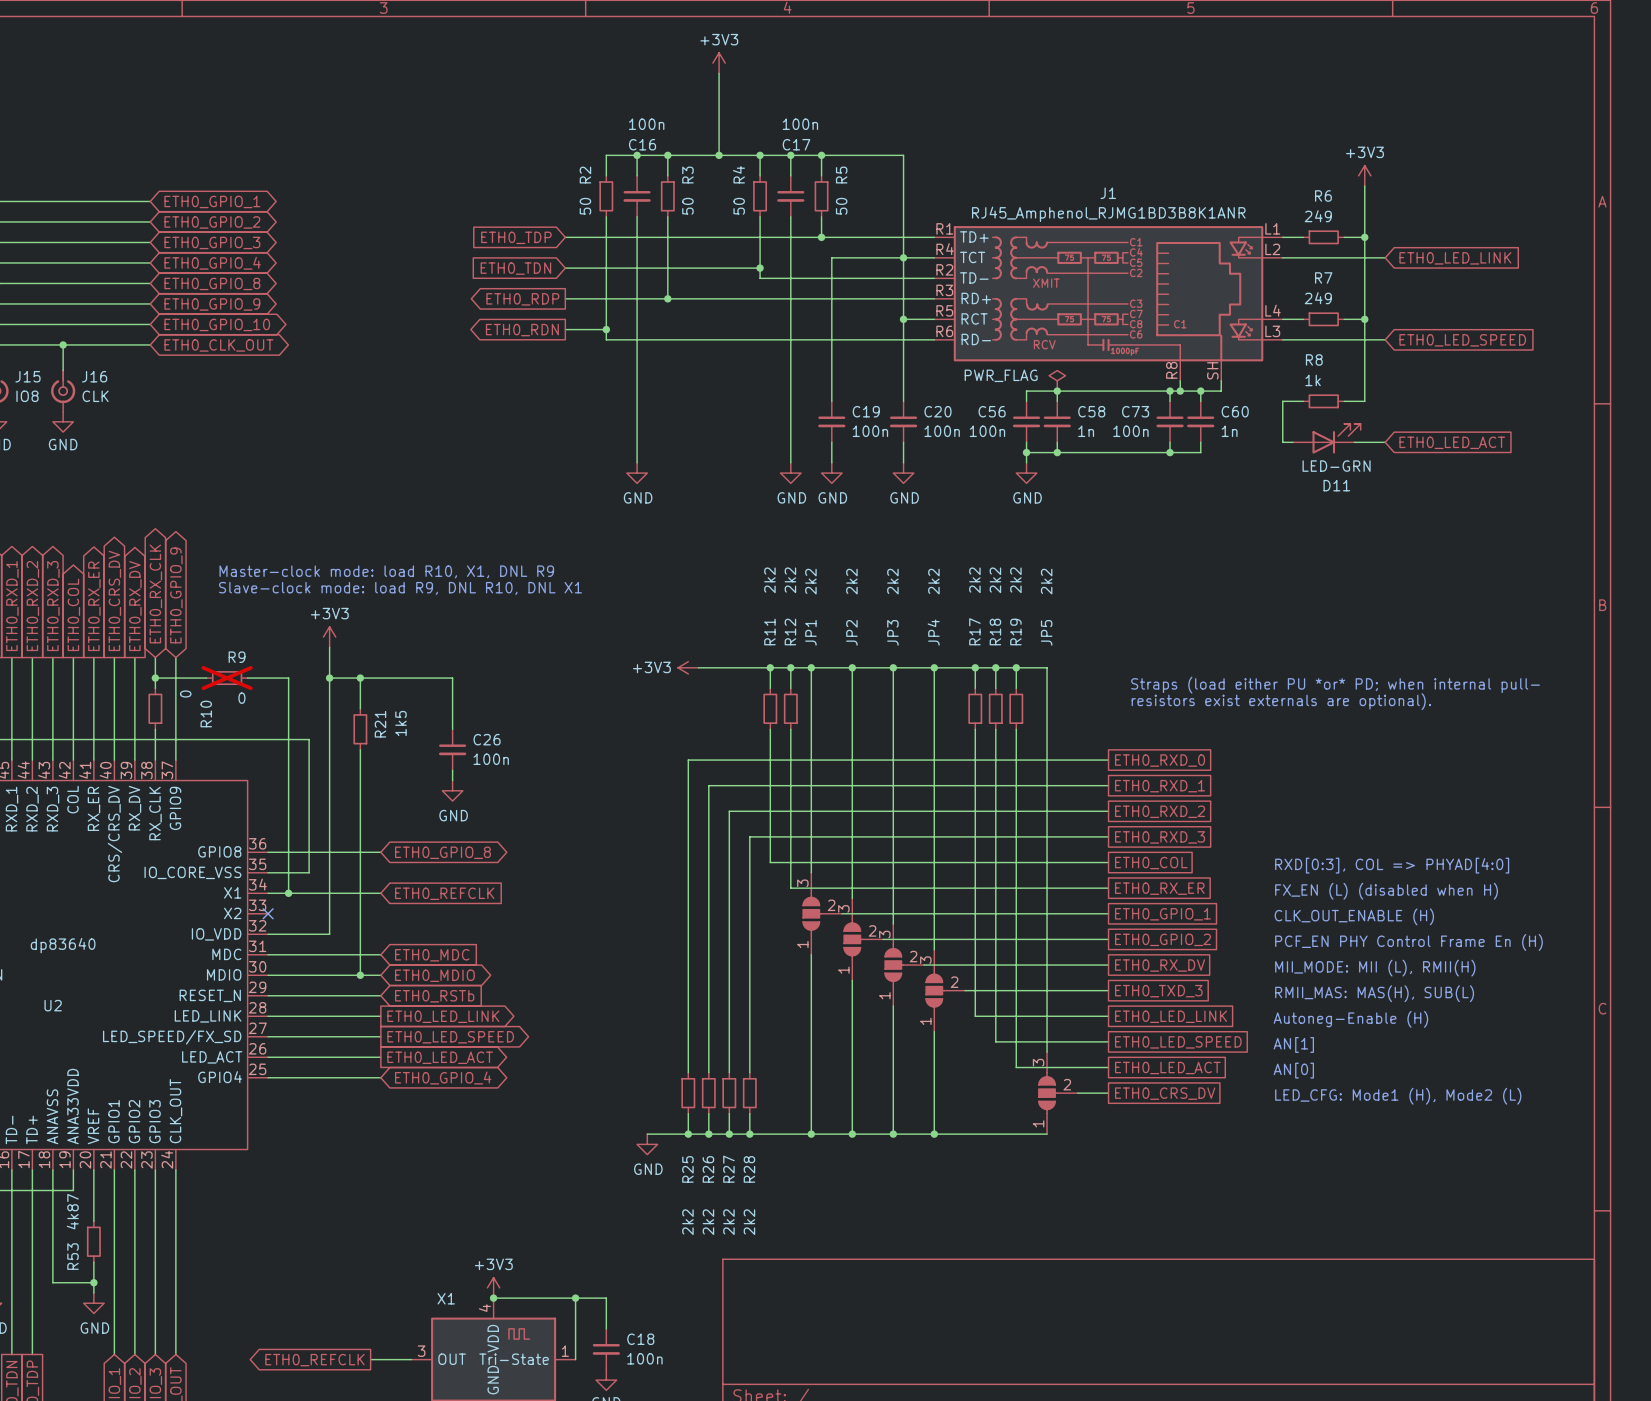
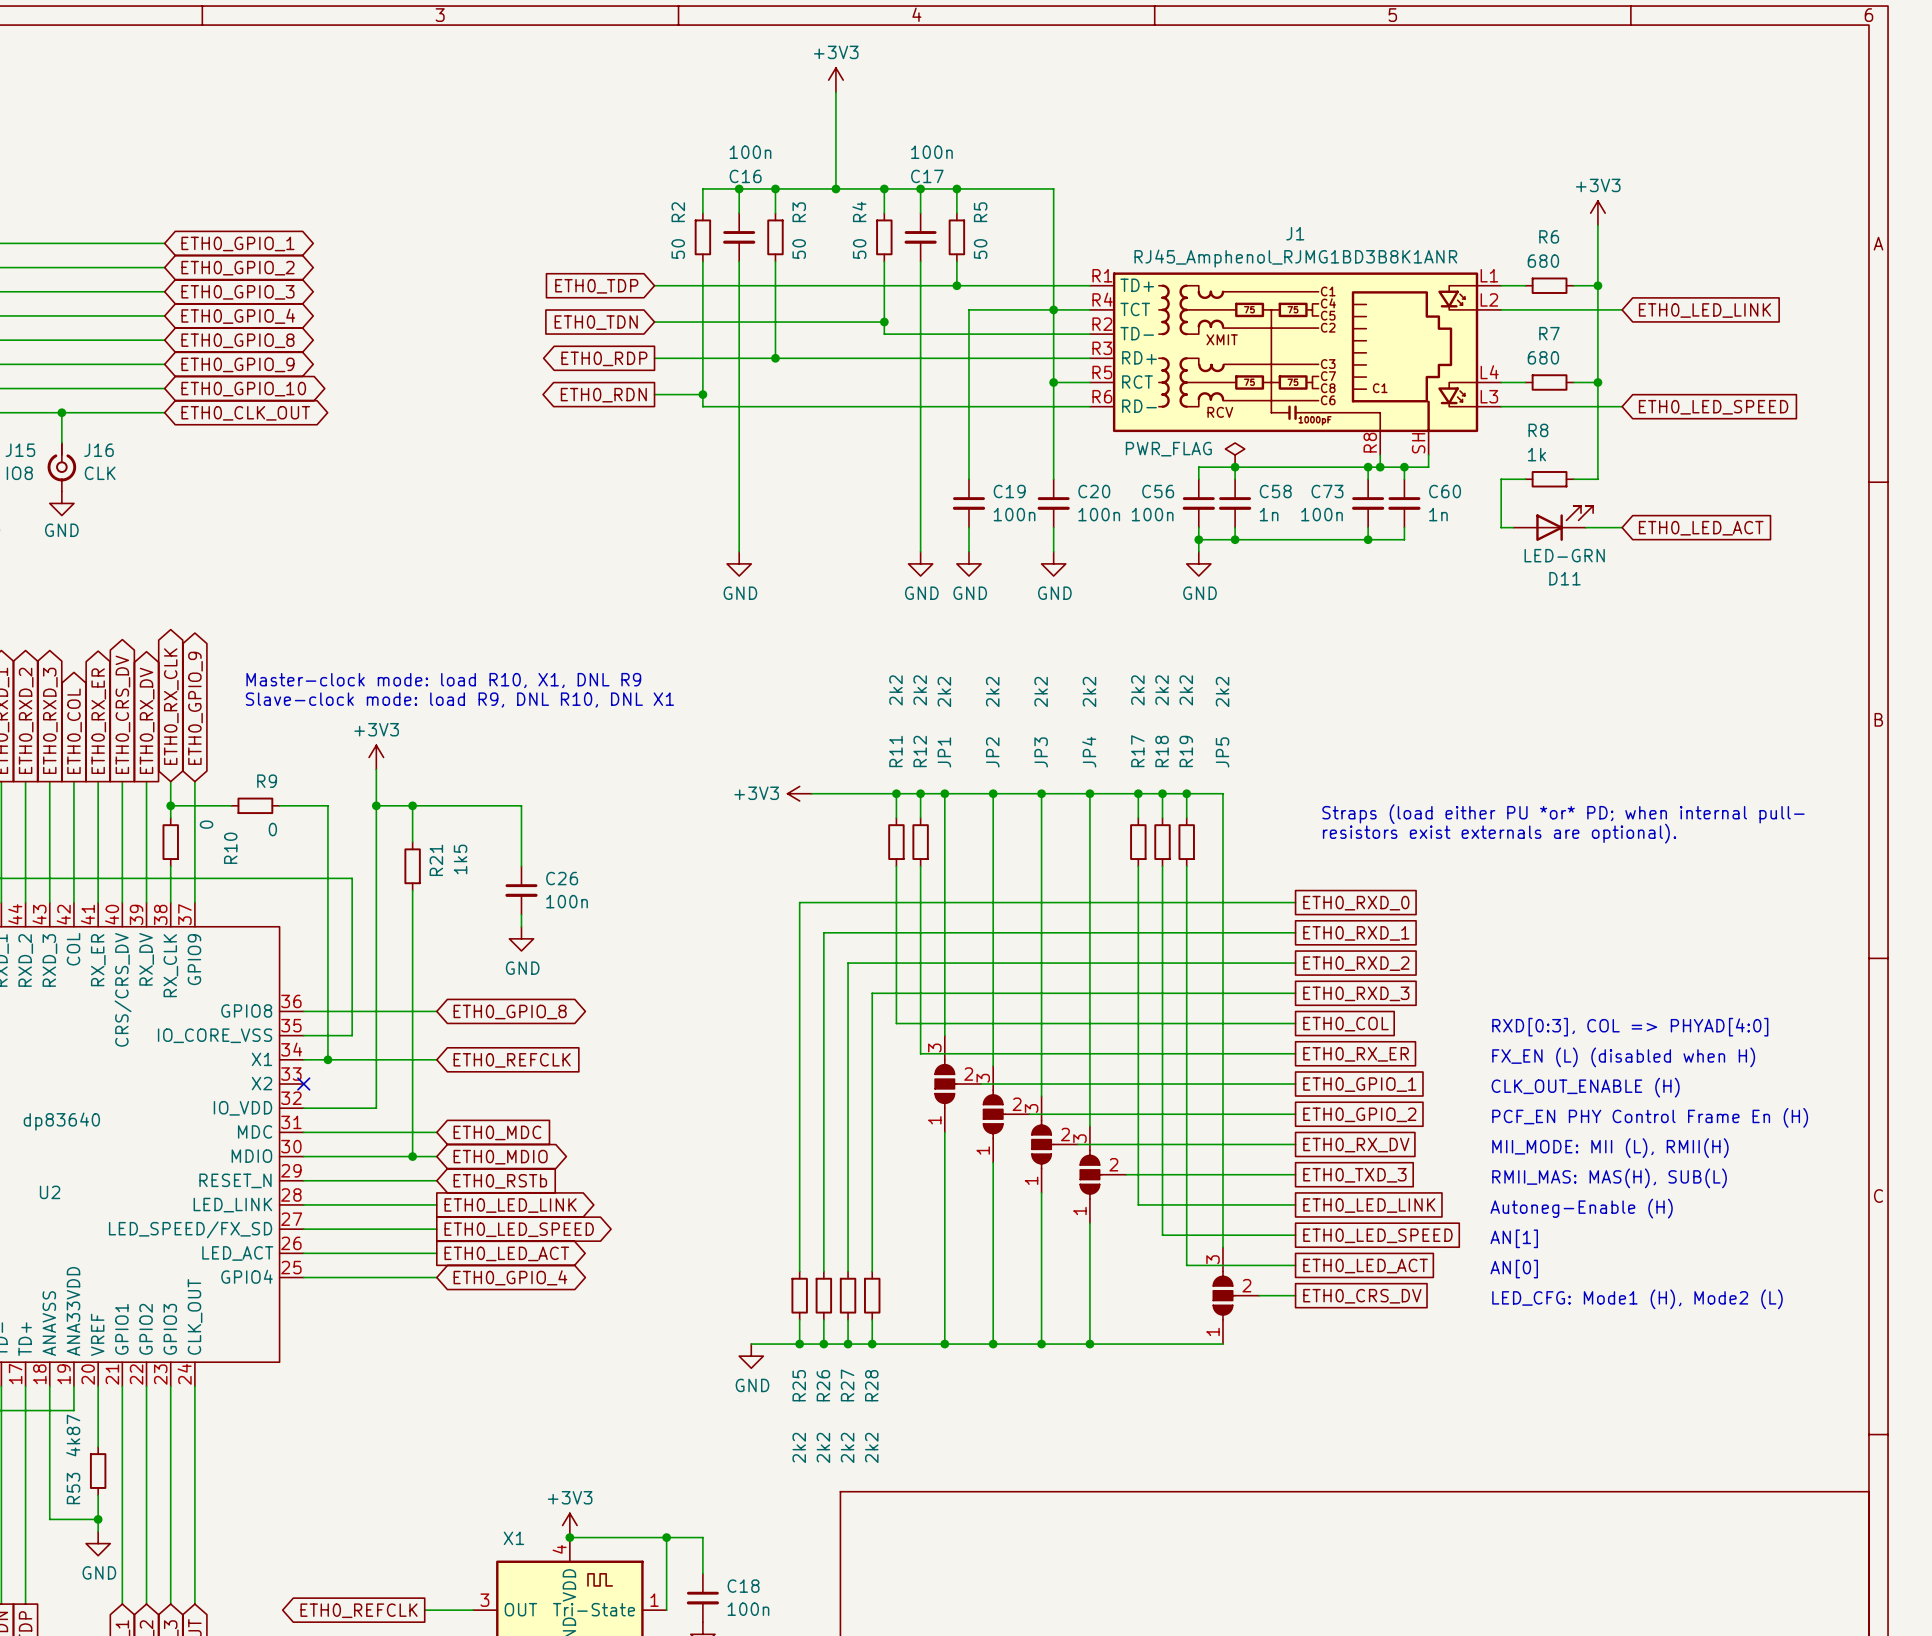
R6 value: 249 (1318, 216) -> 680 (1543, 261)
R7 value: 249 (1318, 298) -> 680 (1543, 357)
R9 do-not-place cross: (227, 678) -> none

